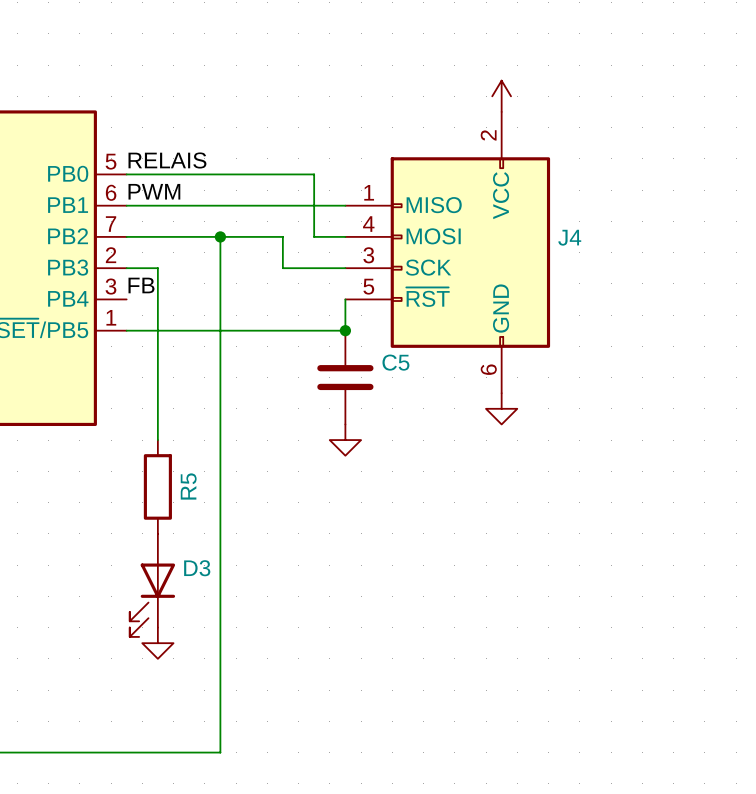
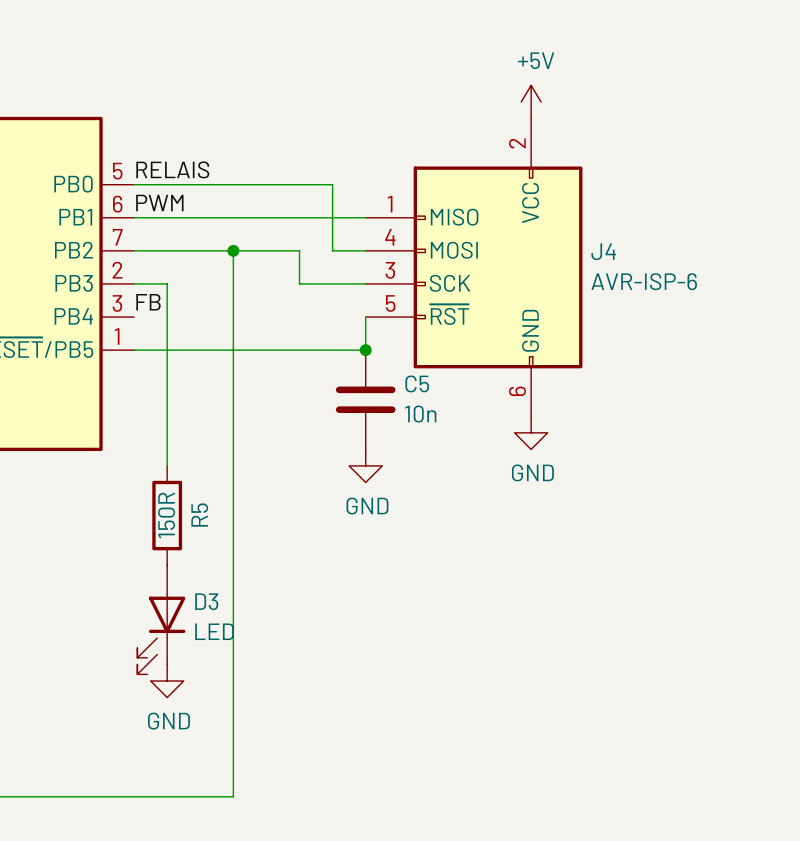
power symbol text: none -> +5V (536, 60)
J4 value: none -> AVR-ISP-6 (644, 281)
C5 value: none -> 10n (420, 414)
power symbol text: none -> GND (532, 472)
power symbol text: none -> GND (367, 506)
R5 value: none -> 150R (166, 515)
D3 value: none -> LED (214, 631)
power symbol text: none -> GND (168, 721)

